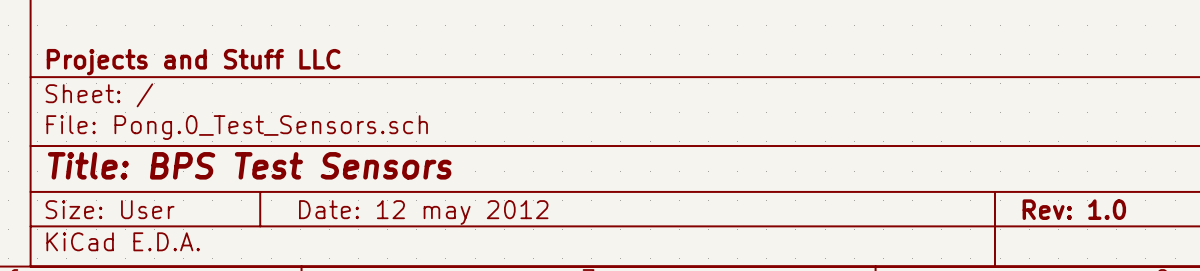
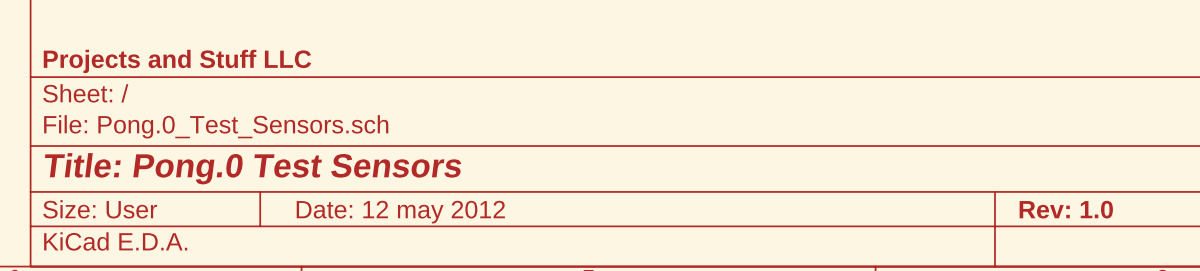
title block: Title: BPS Test Sensors (249, 165) -> Title: Pong.0 Test Sensors (252, 168)

